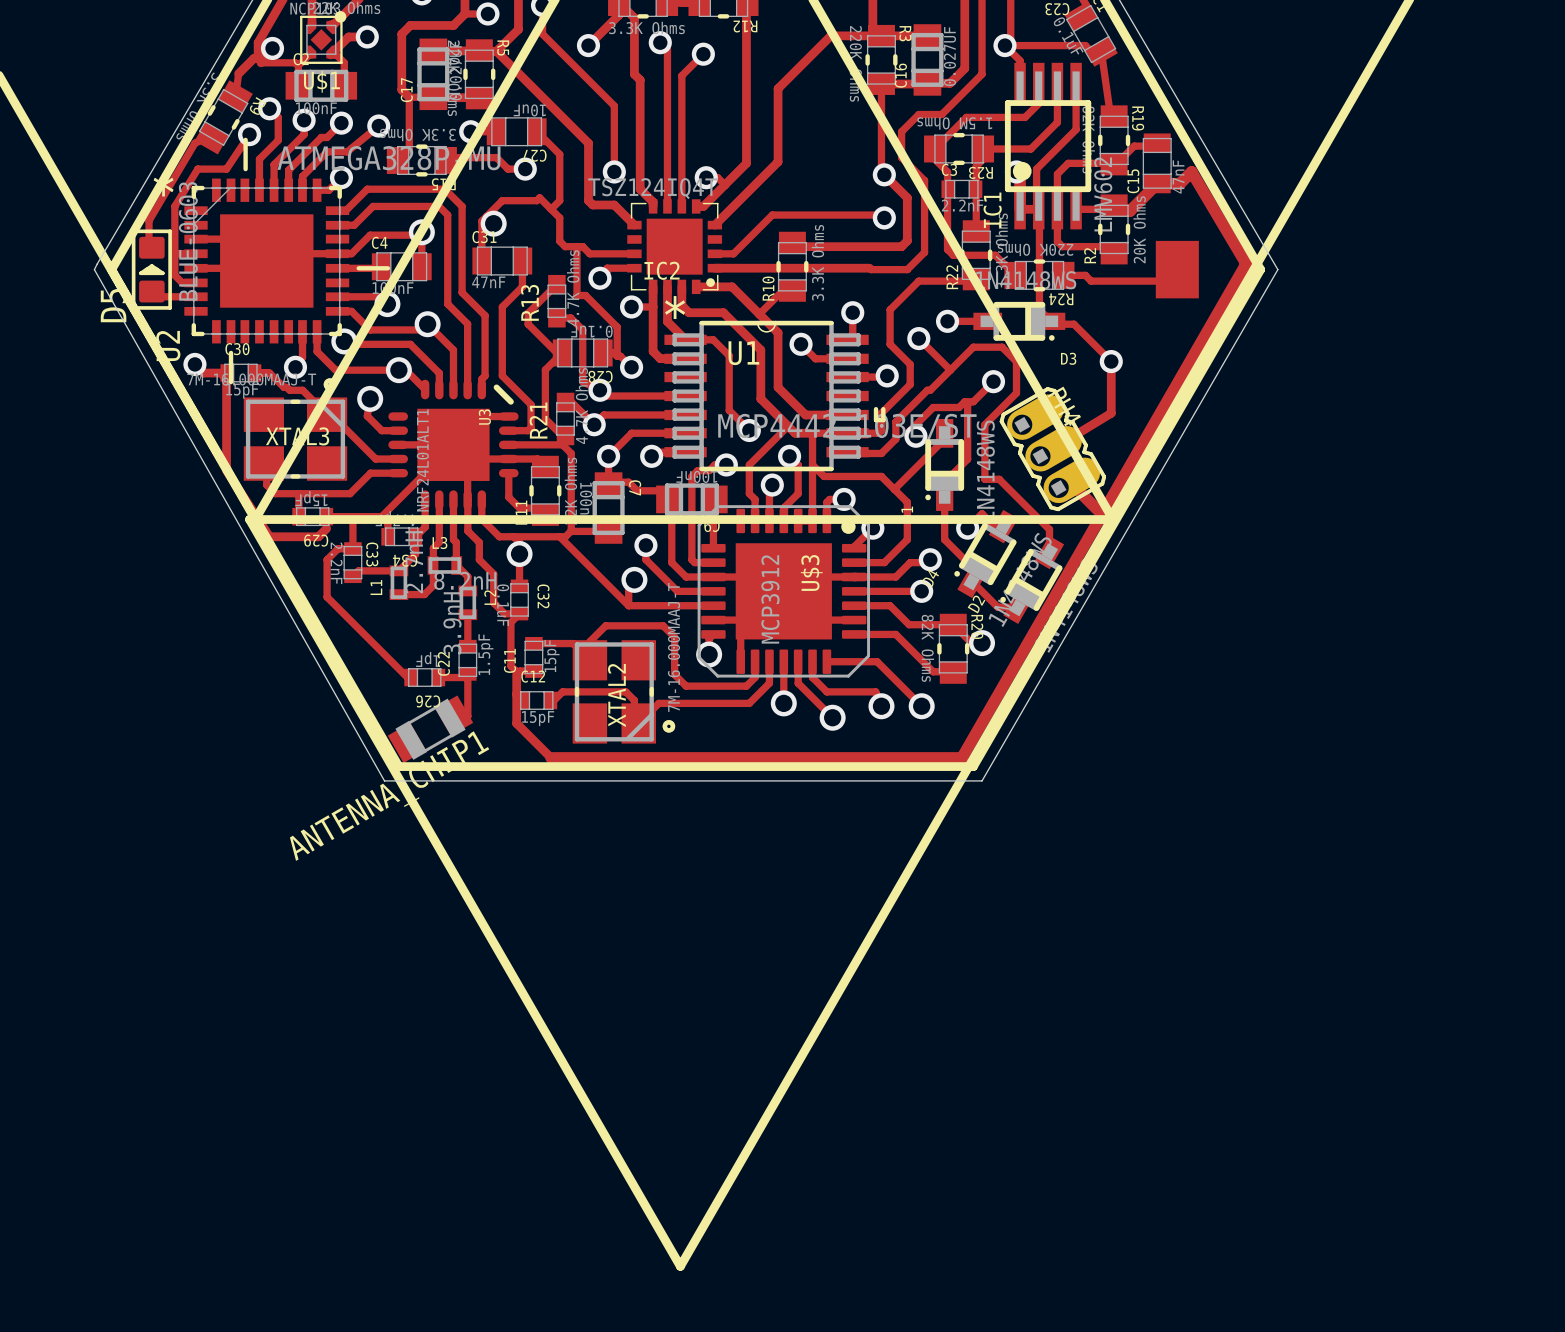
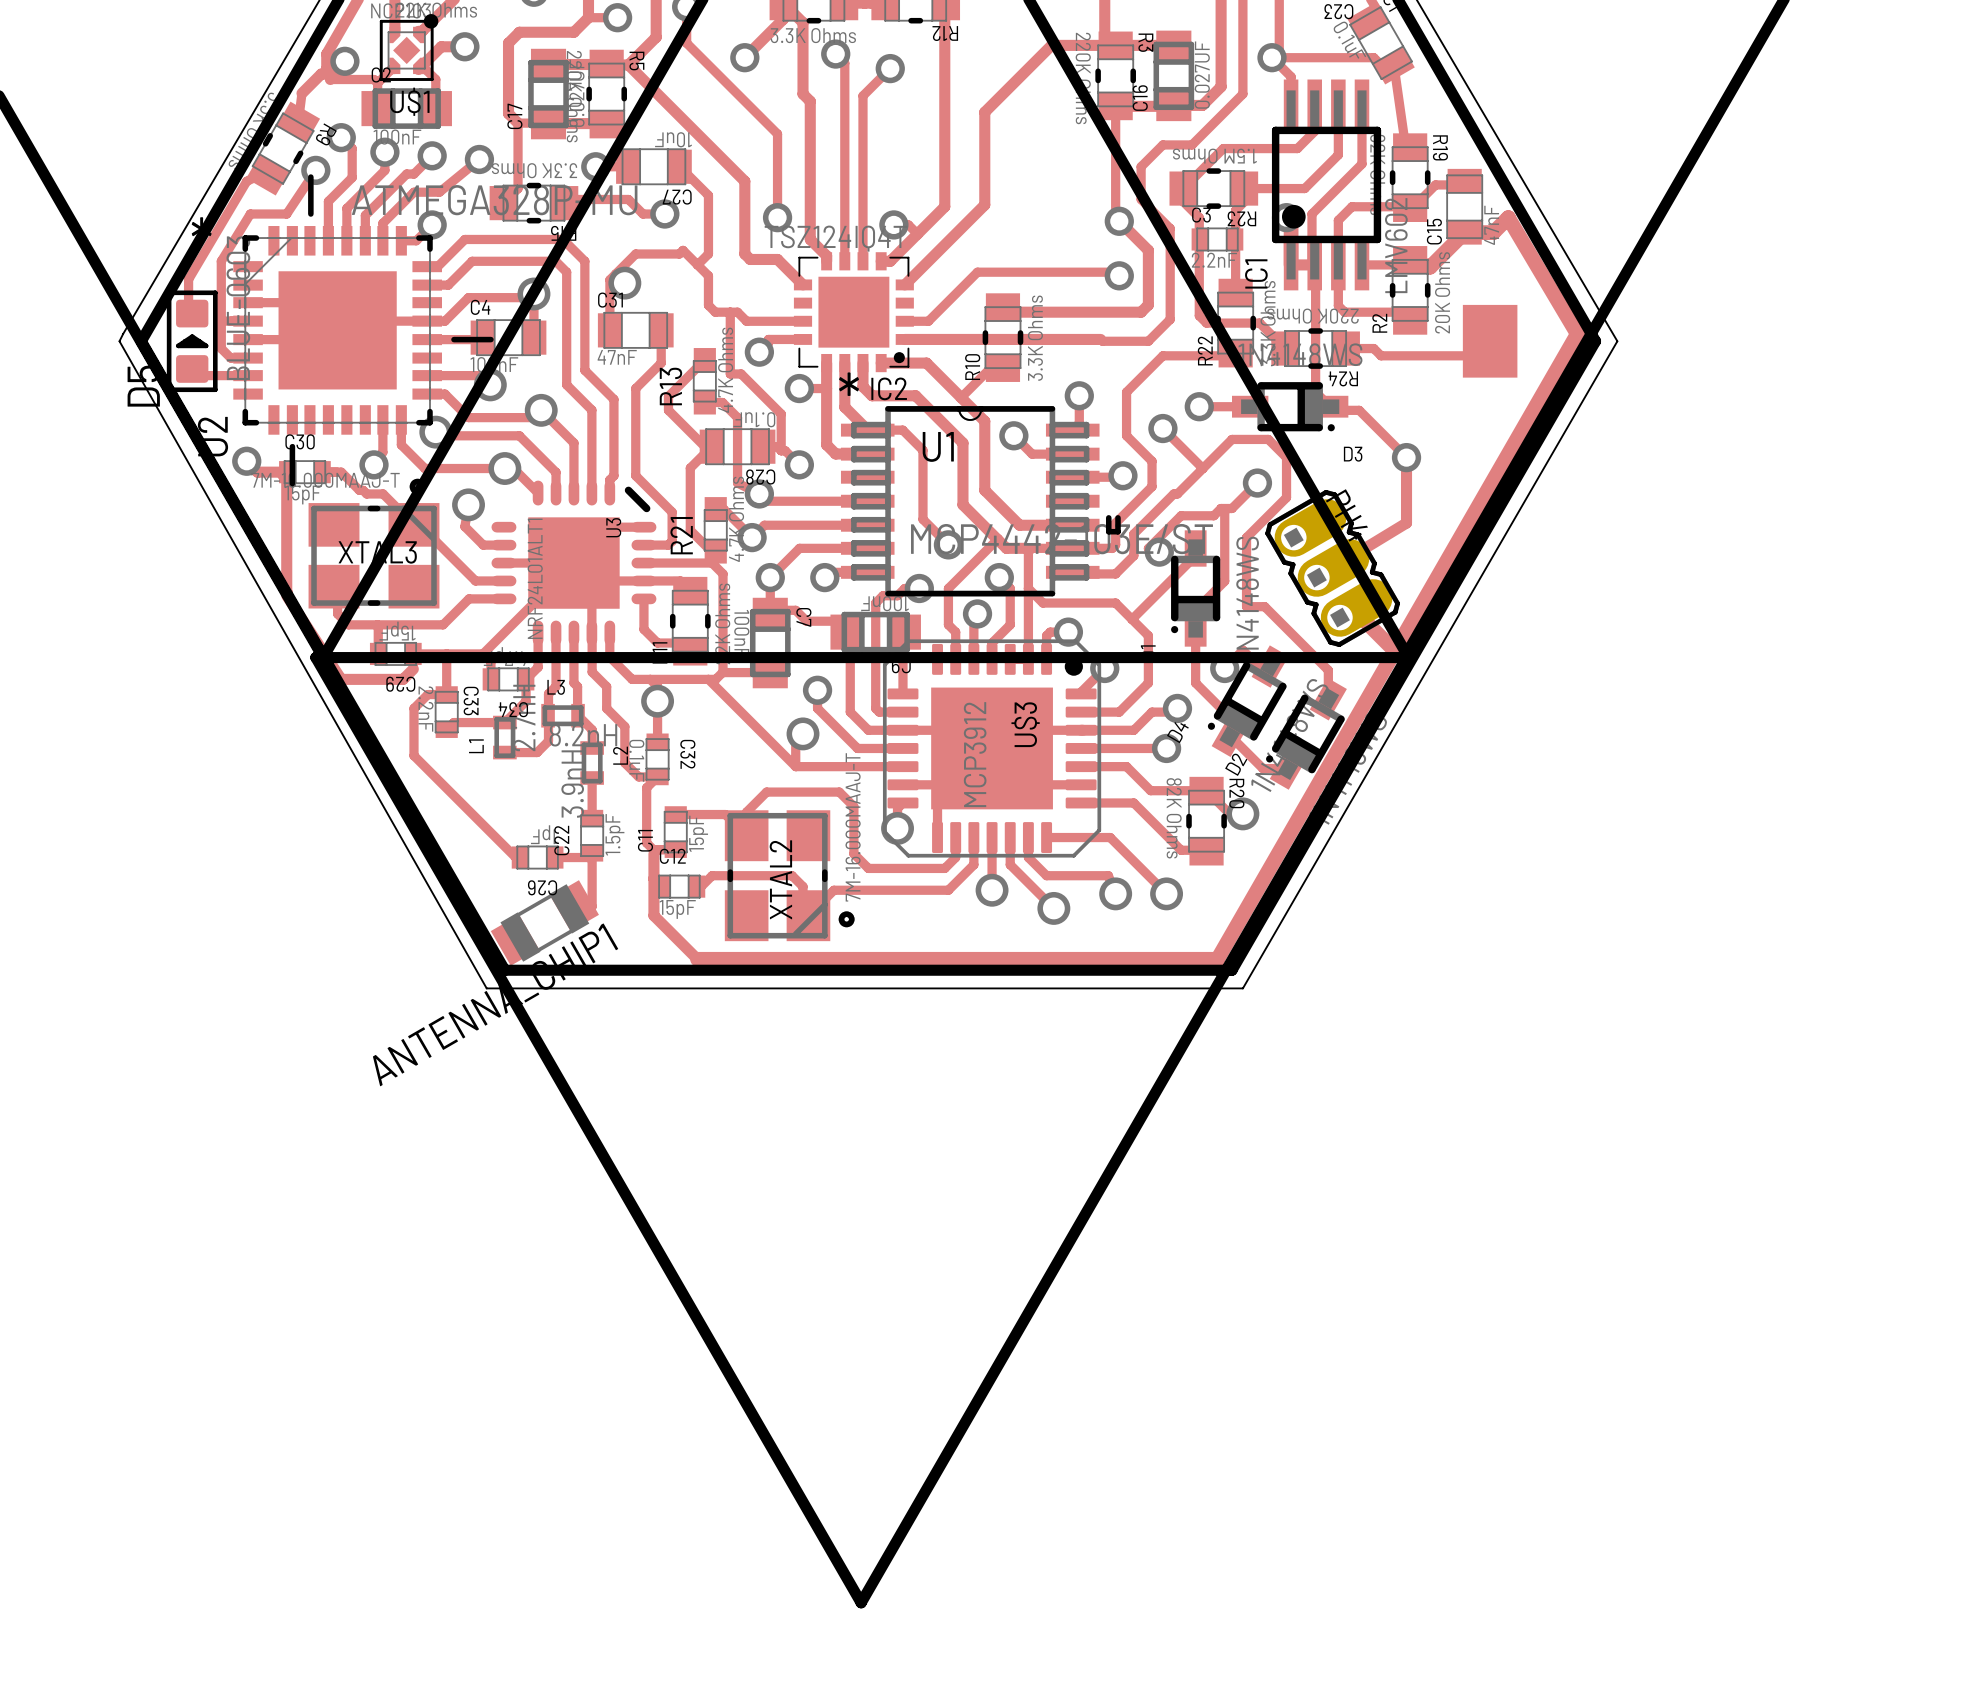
IC2 name position: IC2 (662, 270) -> IC2 (889, 388)

